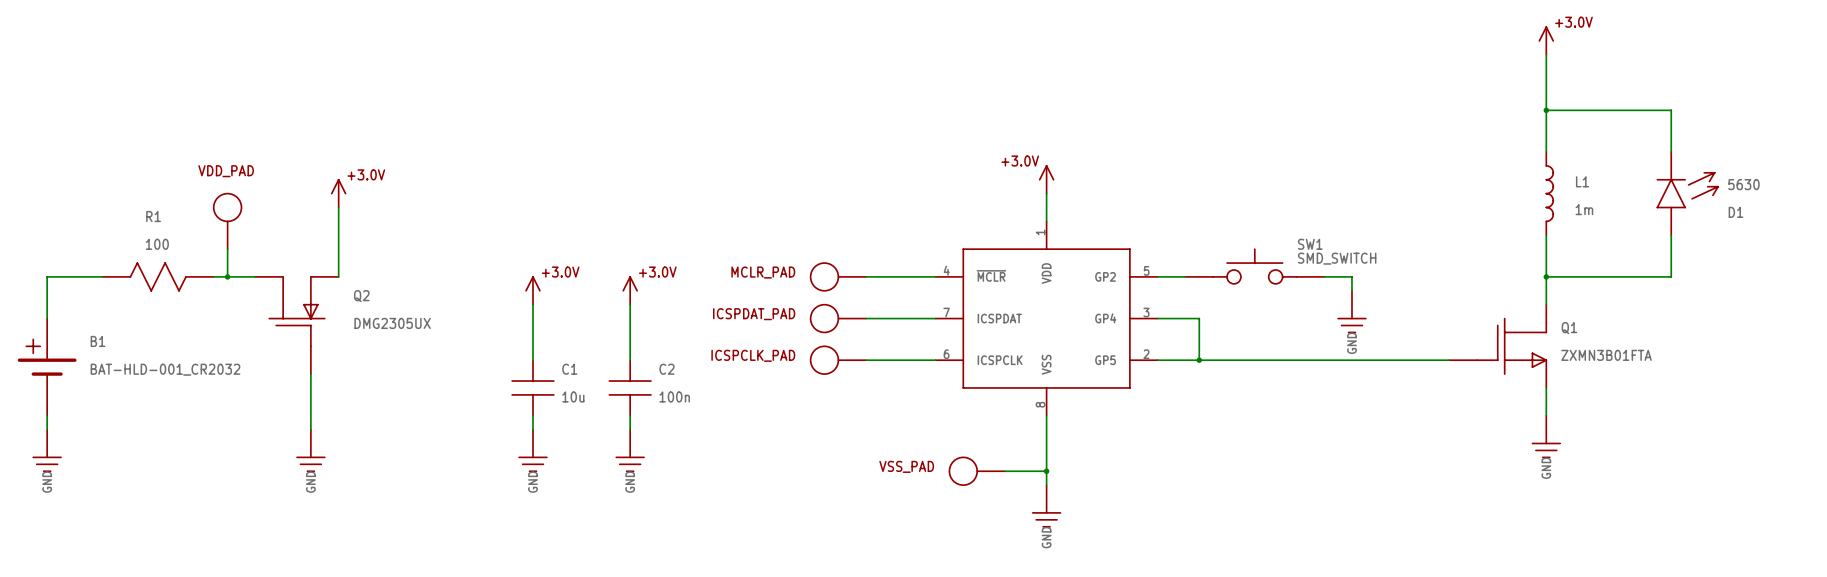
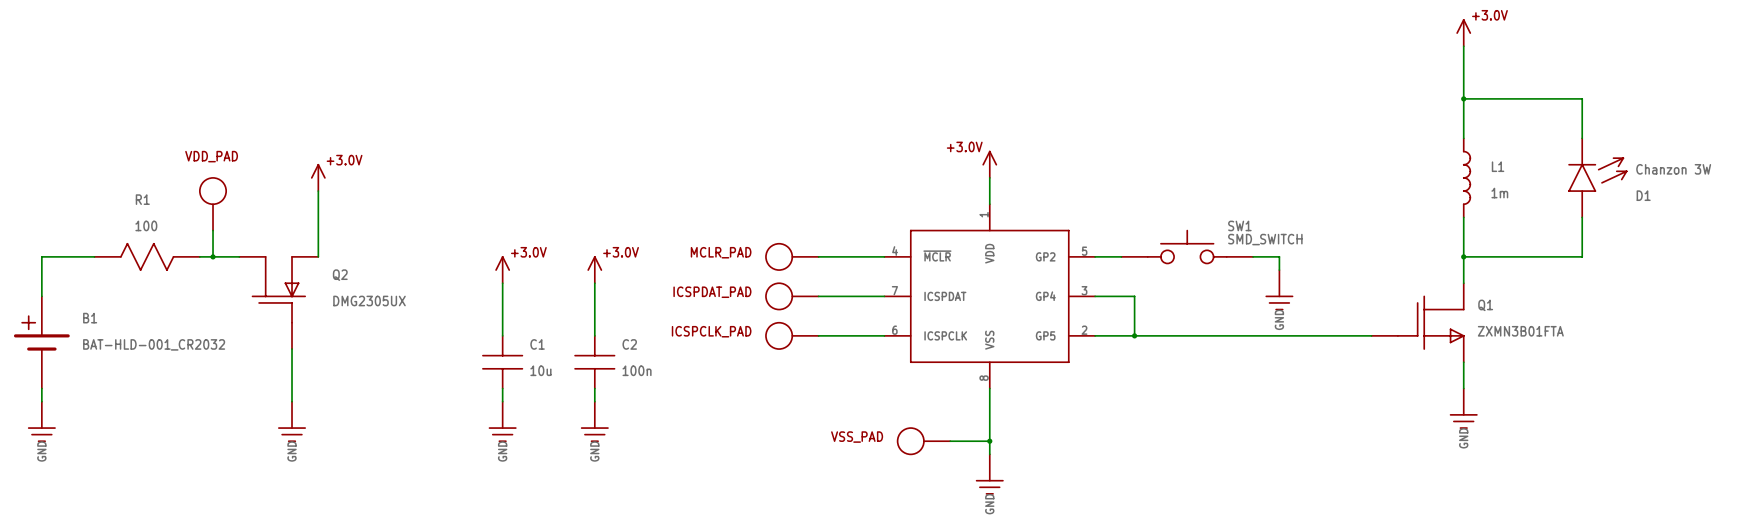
D1 value: 5630 (1743, 184) -> Chanzon 3W (1673, 169)

